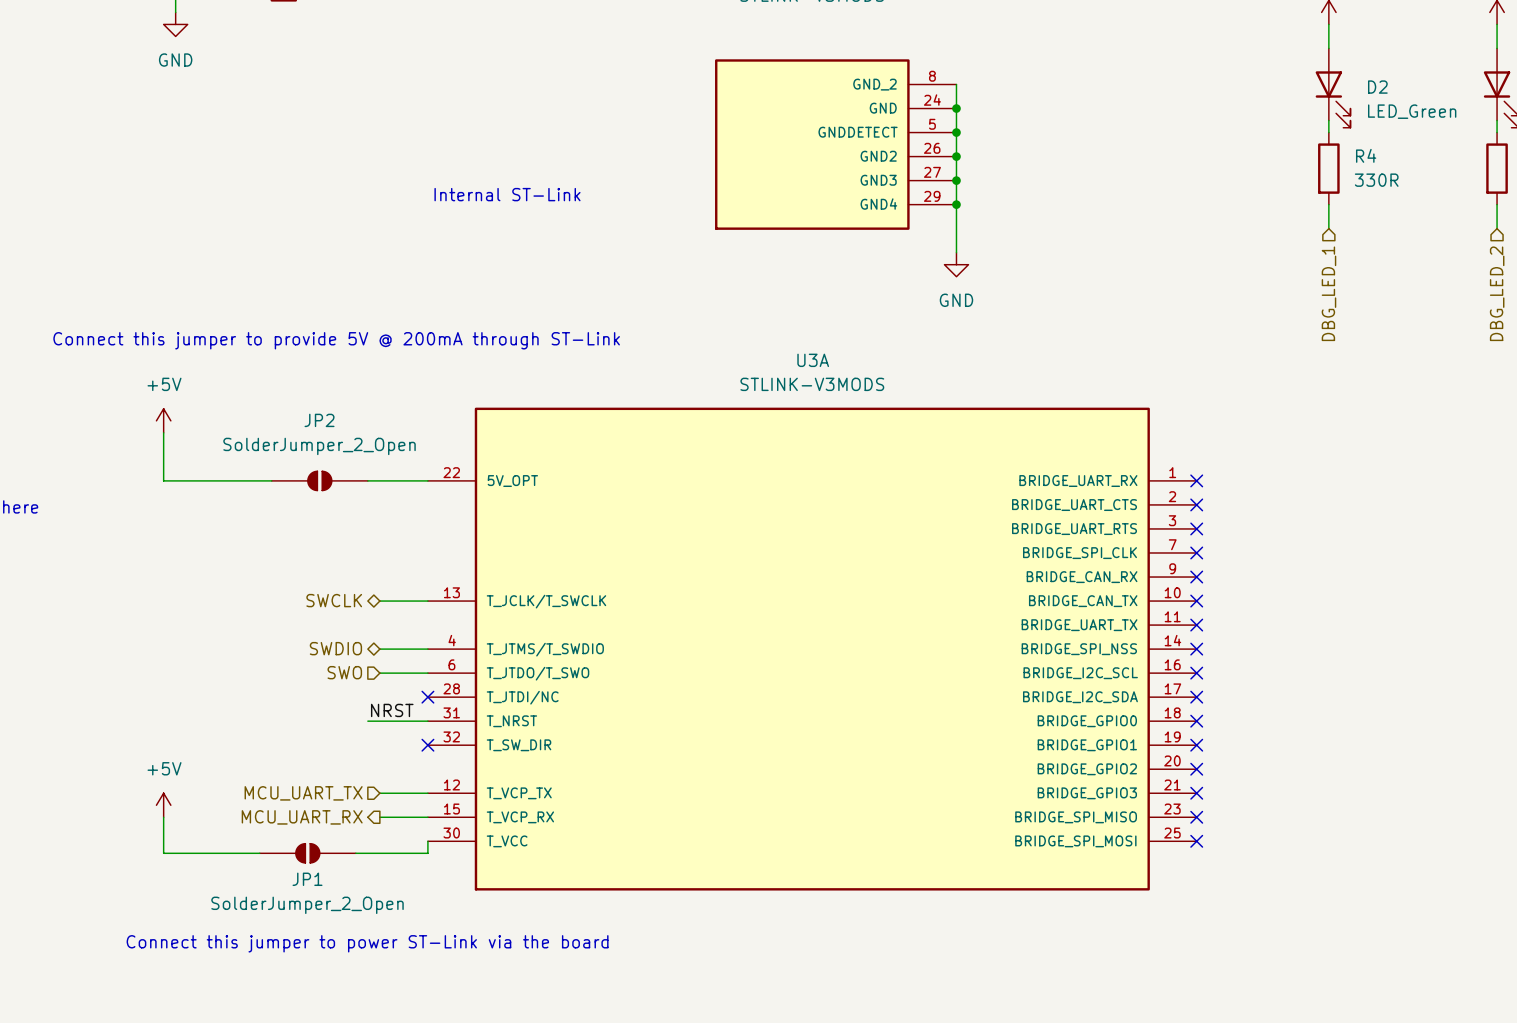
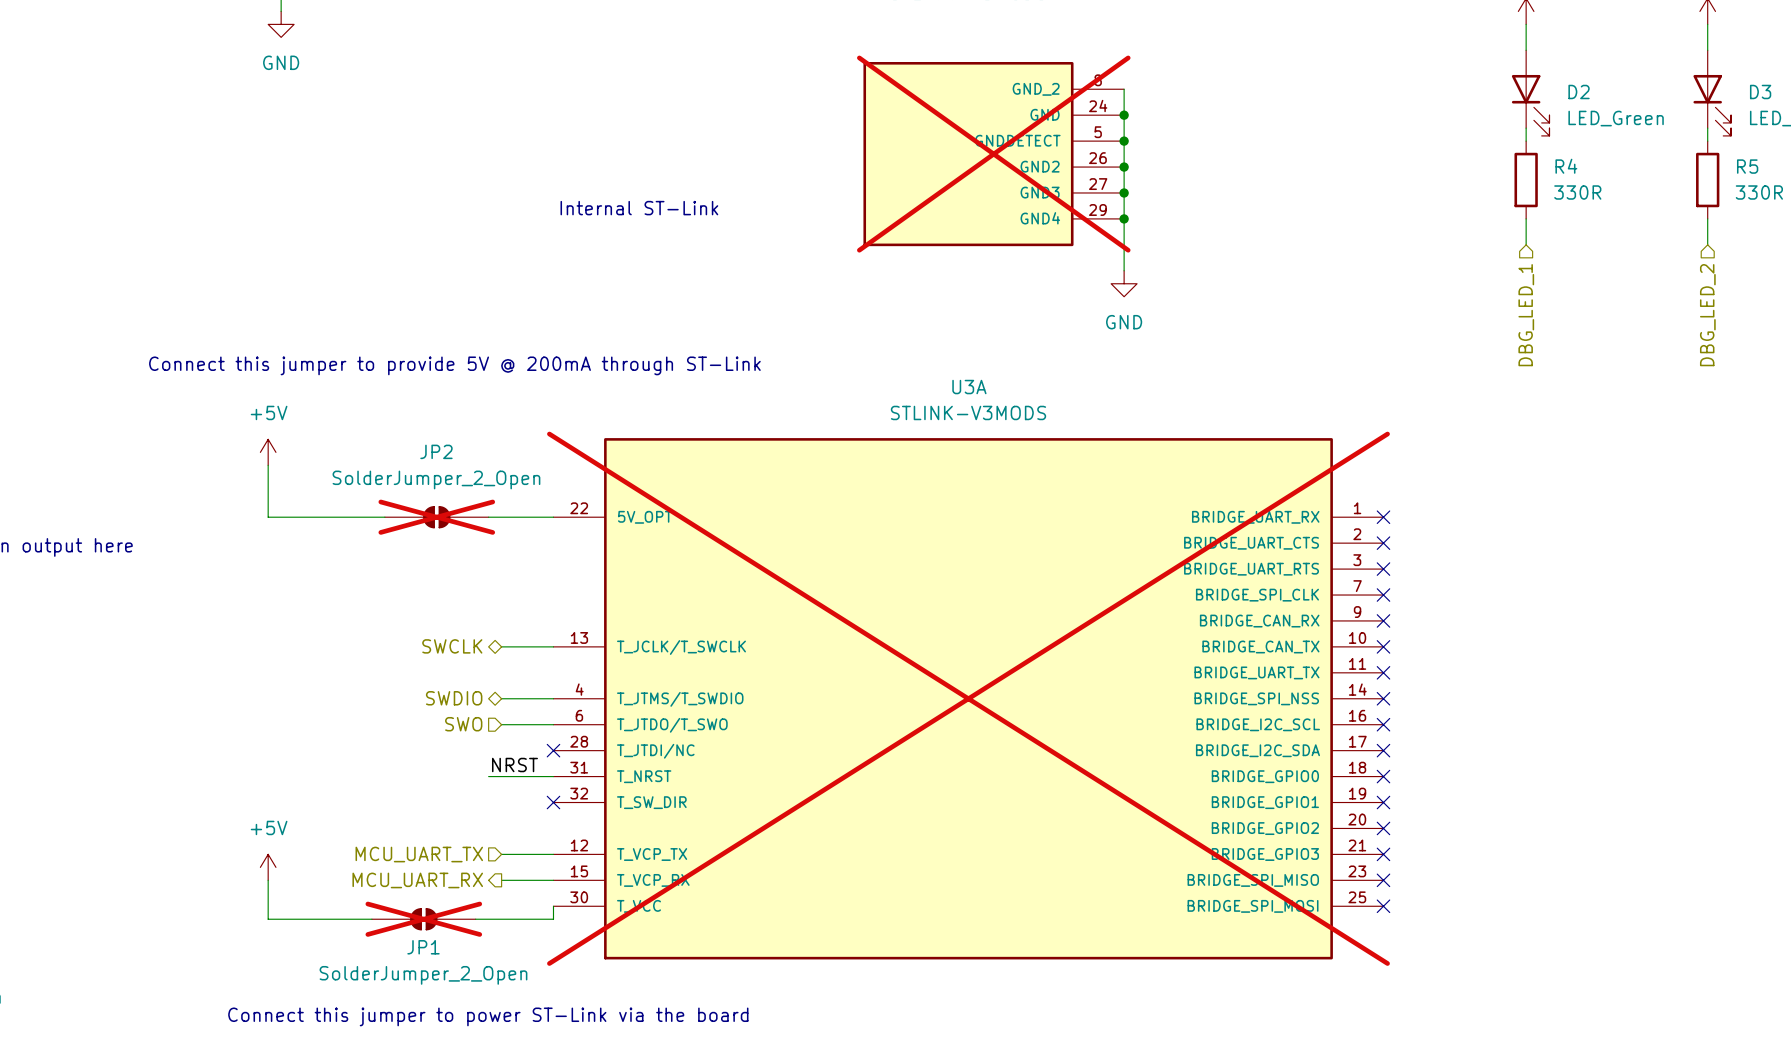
part do-not-place cross: none -> (993, 154)
JP2 do-not-place cross: none -> (436, 517)
U3A do-not-place cross: none -> (968, 698)
JP1 do-not-place cross: none -> (423, 919)

